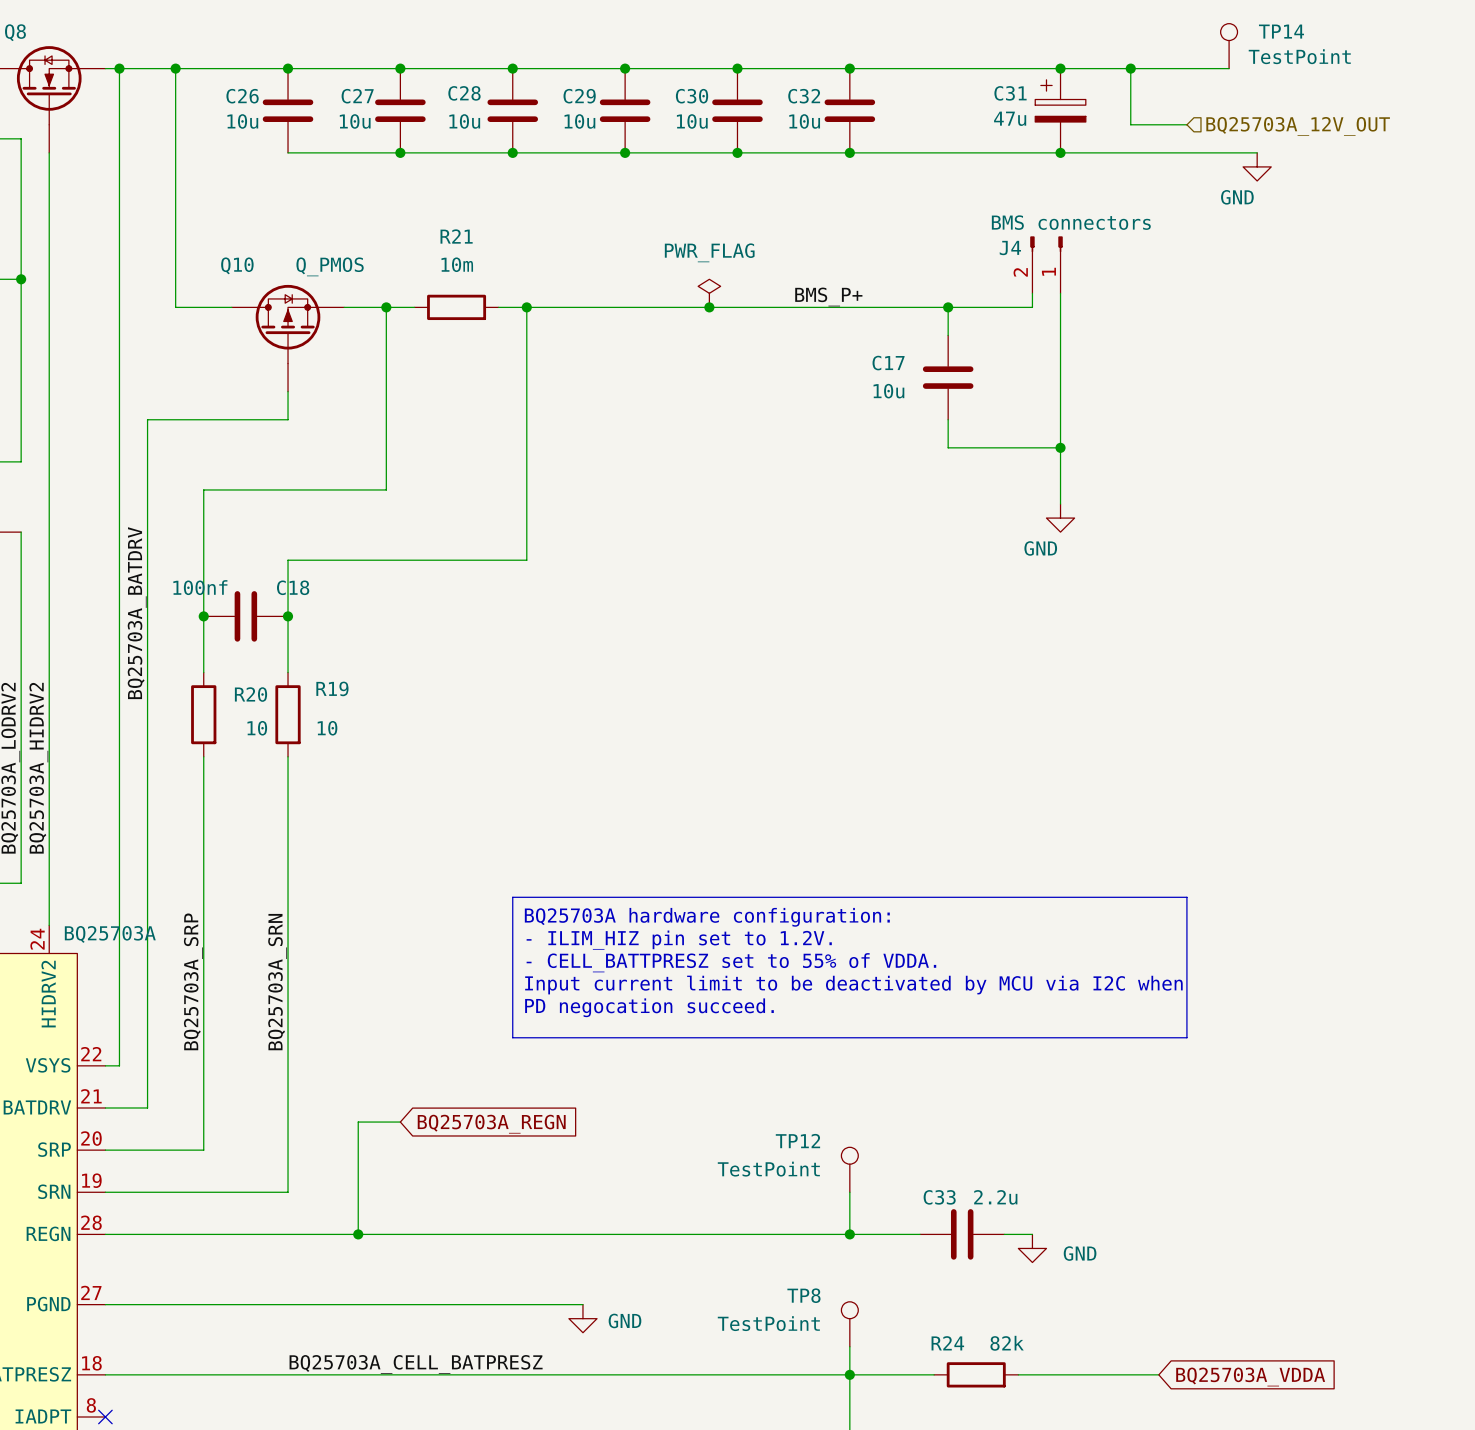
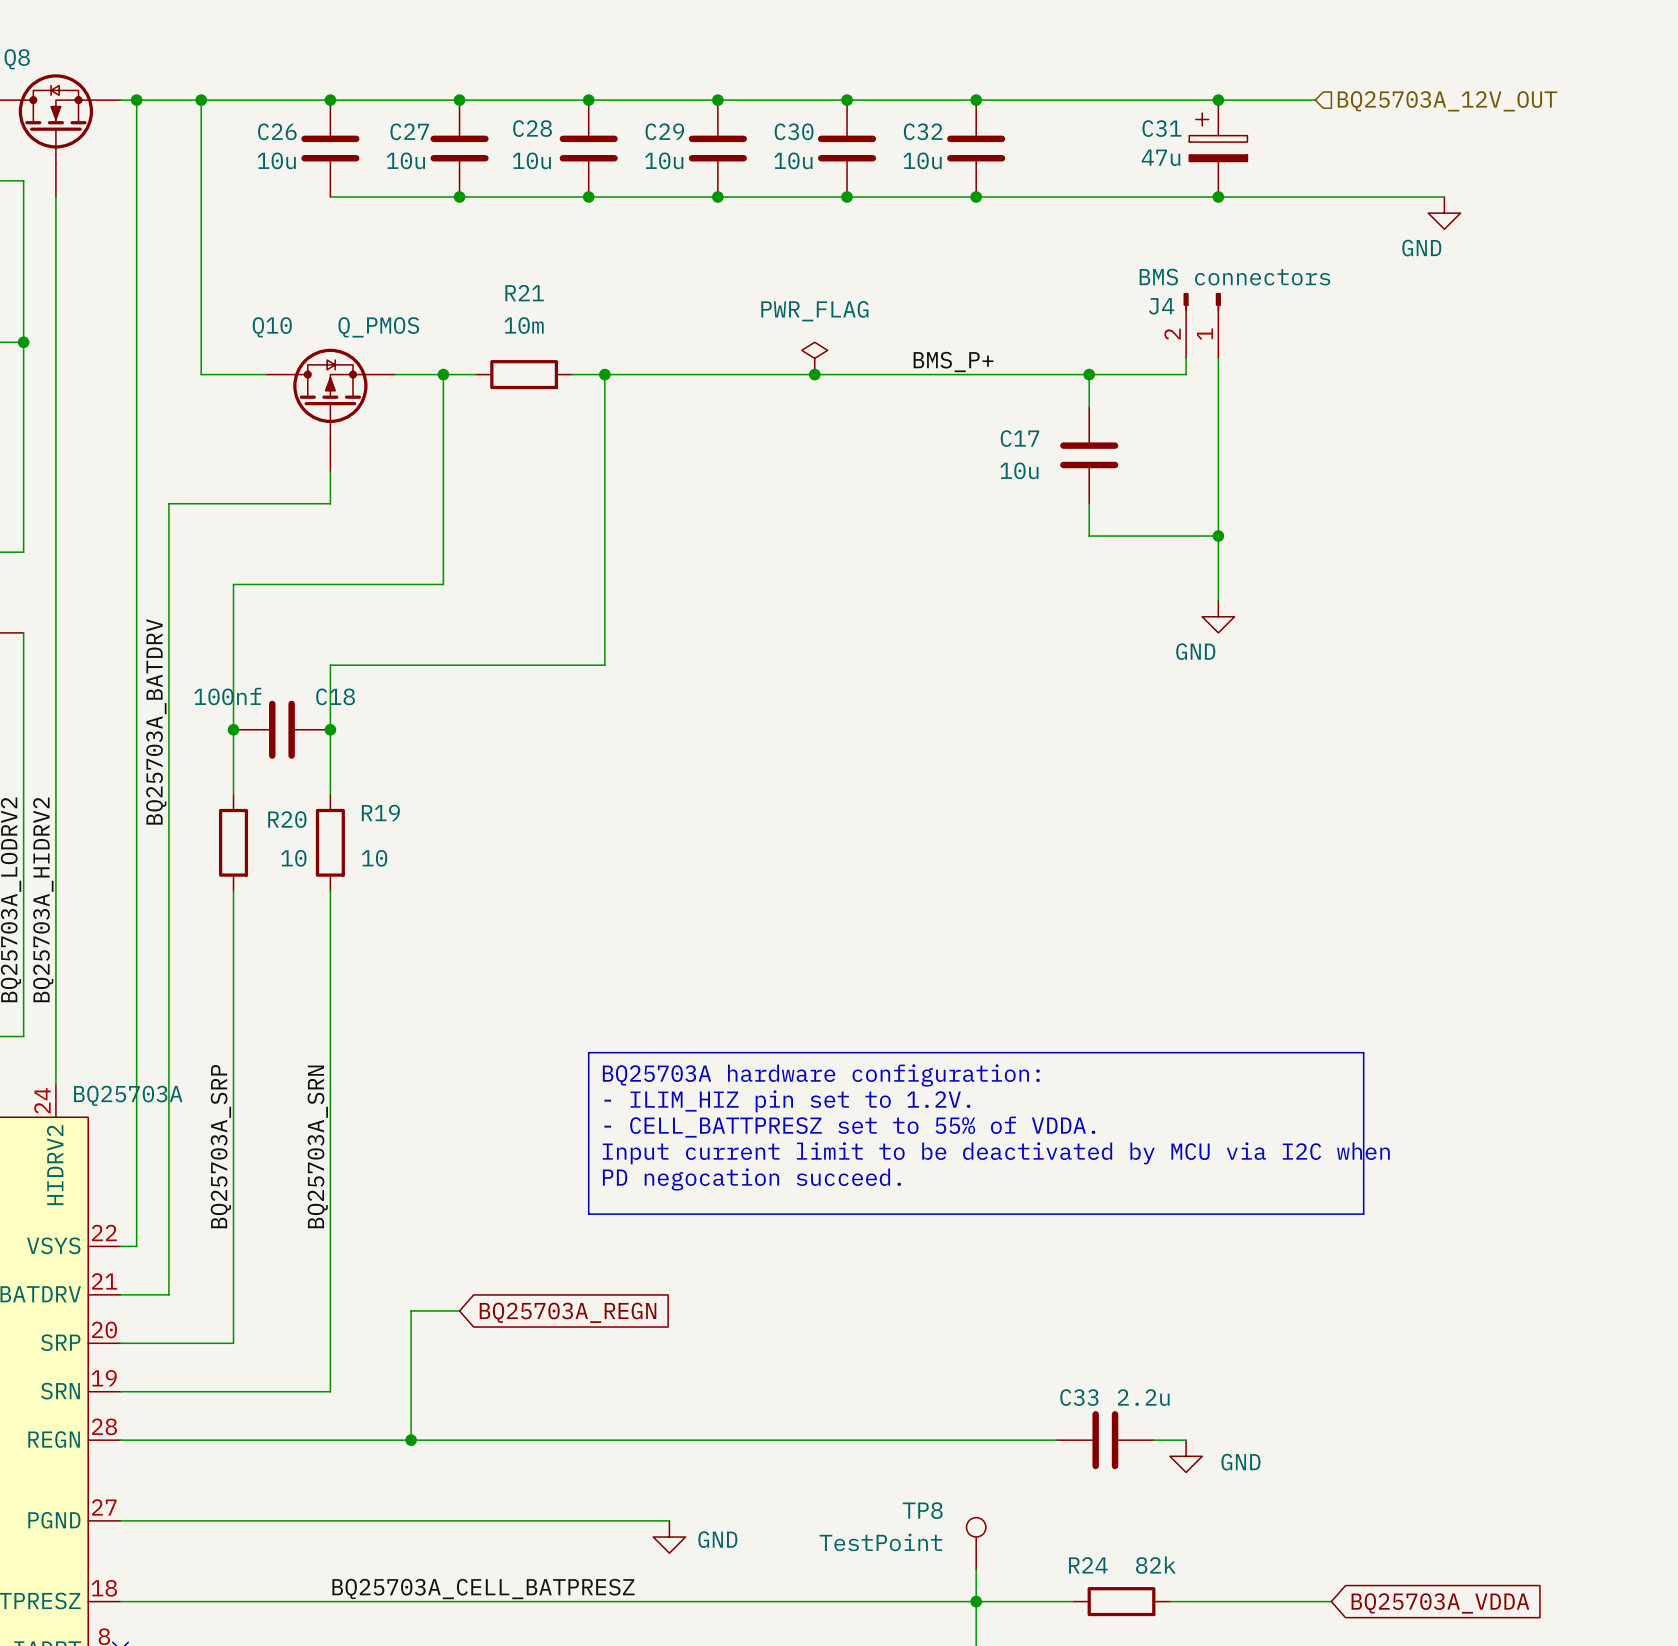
TP14: TestPoint (1229, 46) -> none
wire: (1130, 68) (1130, 124) (1186, 124) -> none
junction: (1130, 68) -> none
wire: (1144, 68) (1229, 68) -> none
hierarchical label position: BQ25703A_12V_OUT (1298, 126) -> BQ25703A_12V_OUT (1447, 101)
TP12: TestPoint (849, 1169) -> none
wire: (849, 1192) (849, 1234) -> none
junction: (849, 1234) -> none

